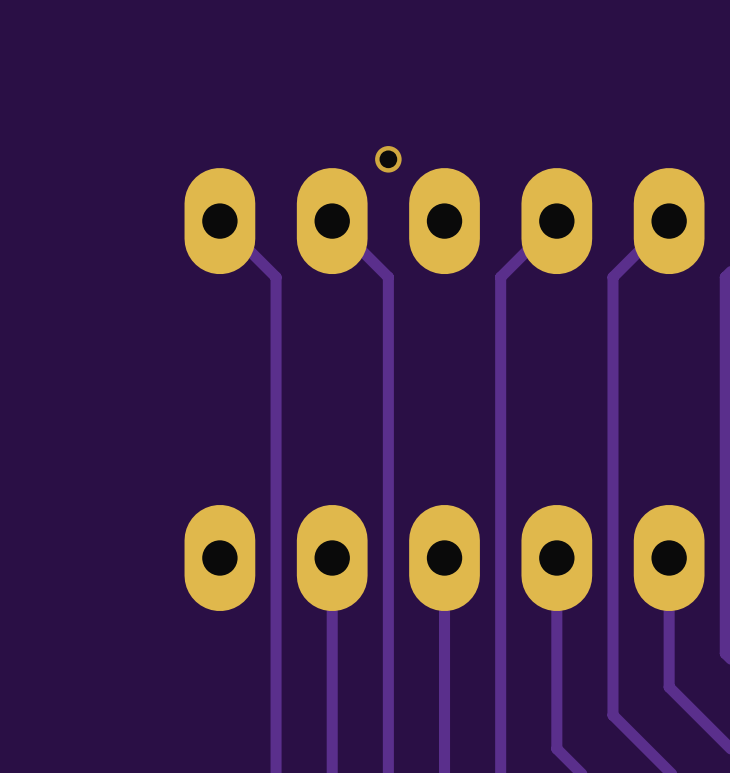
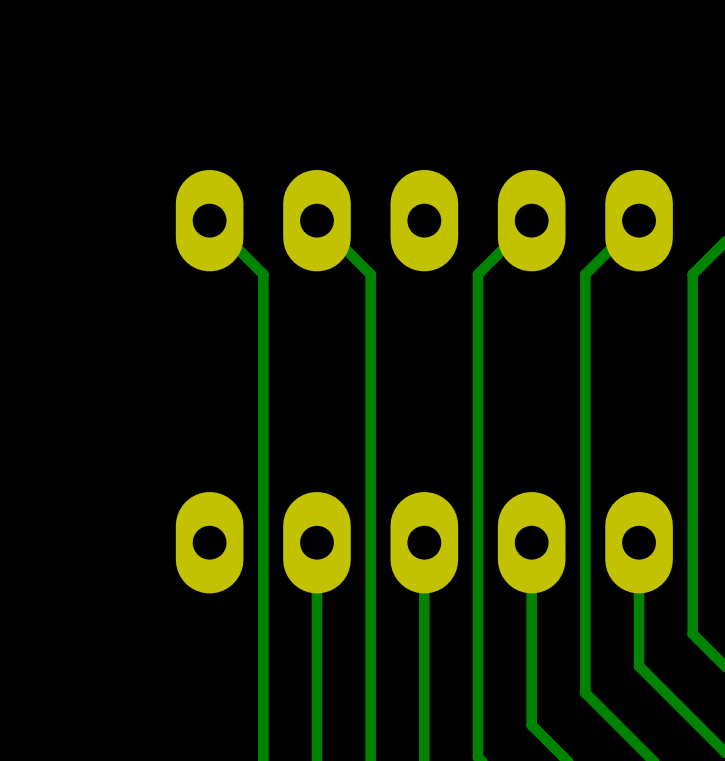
via: (388, 159) -> none

